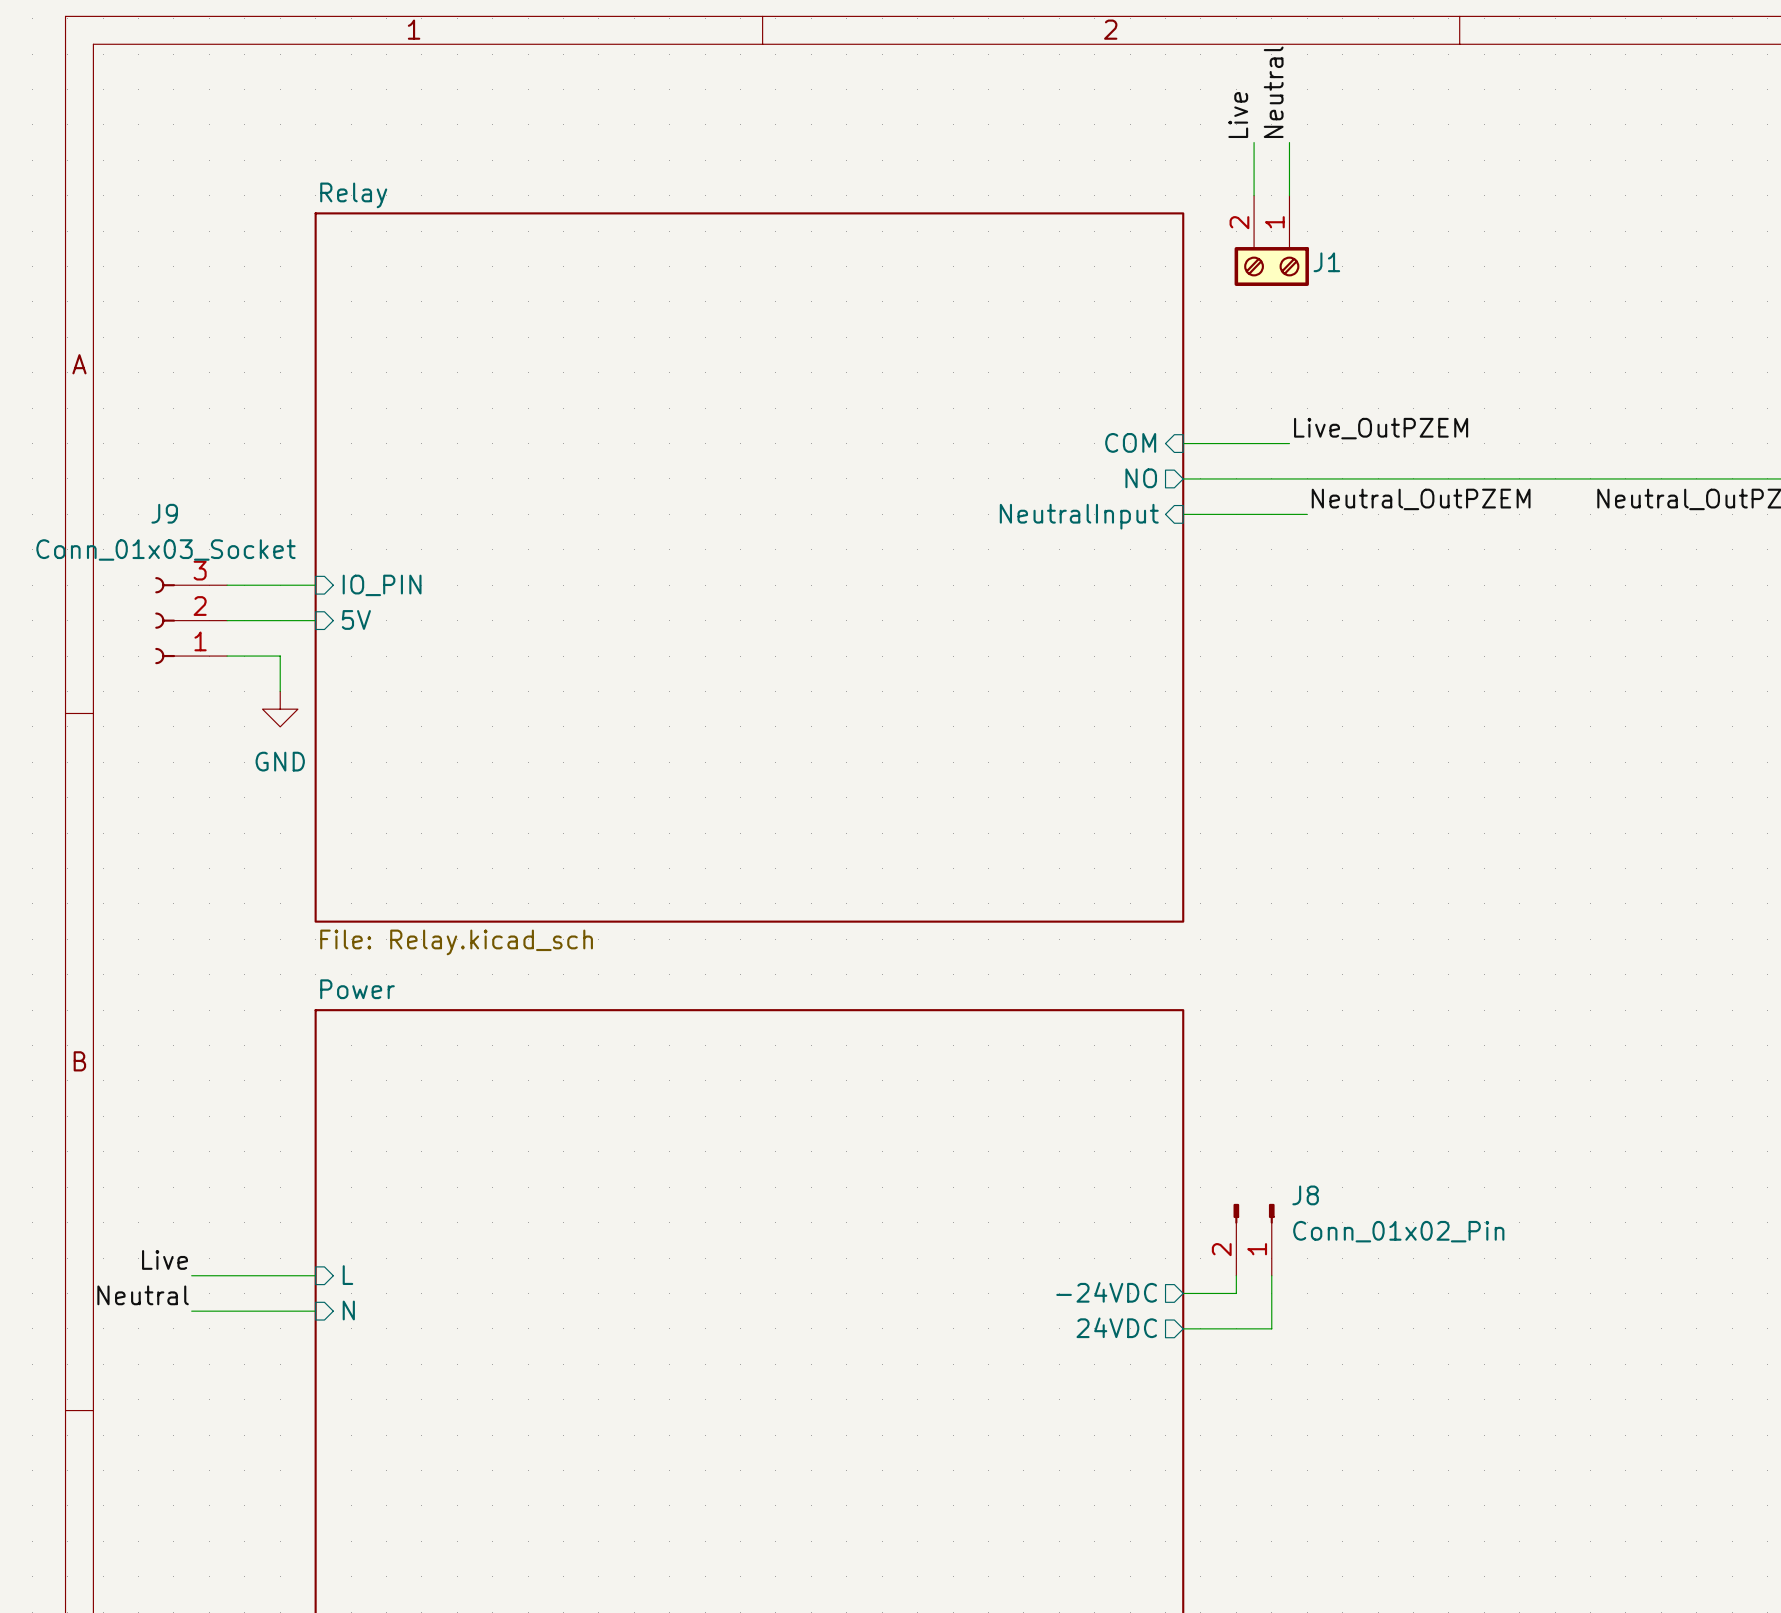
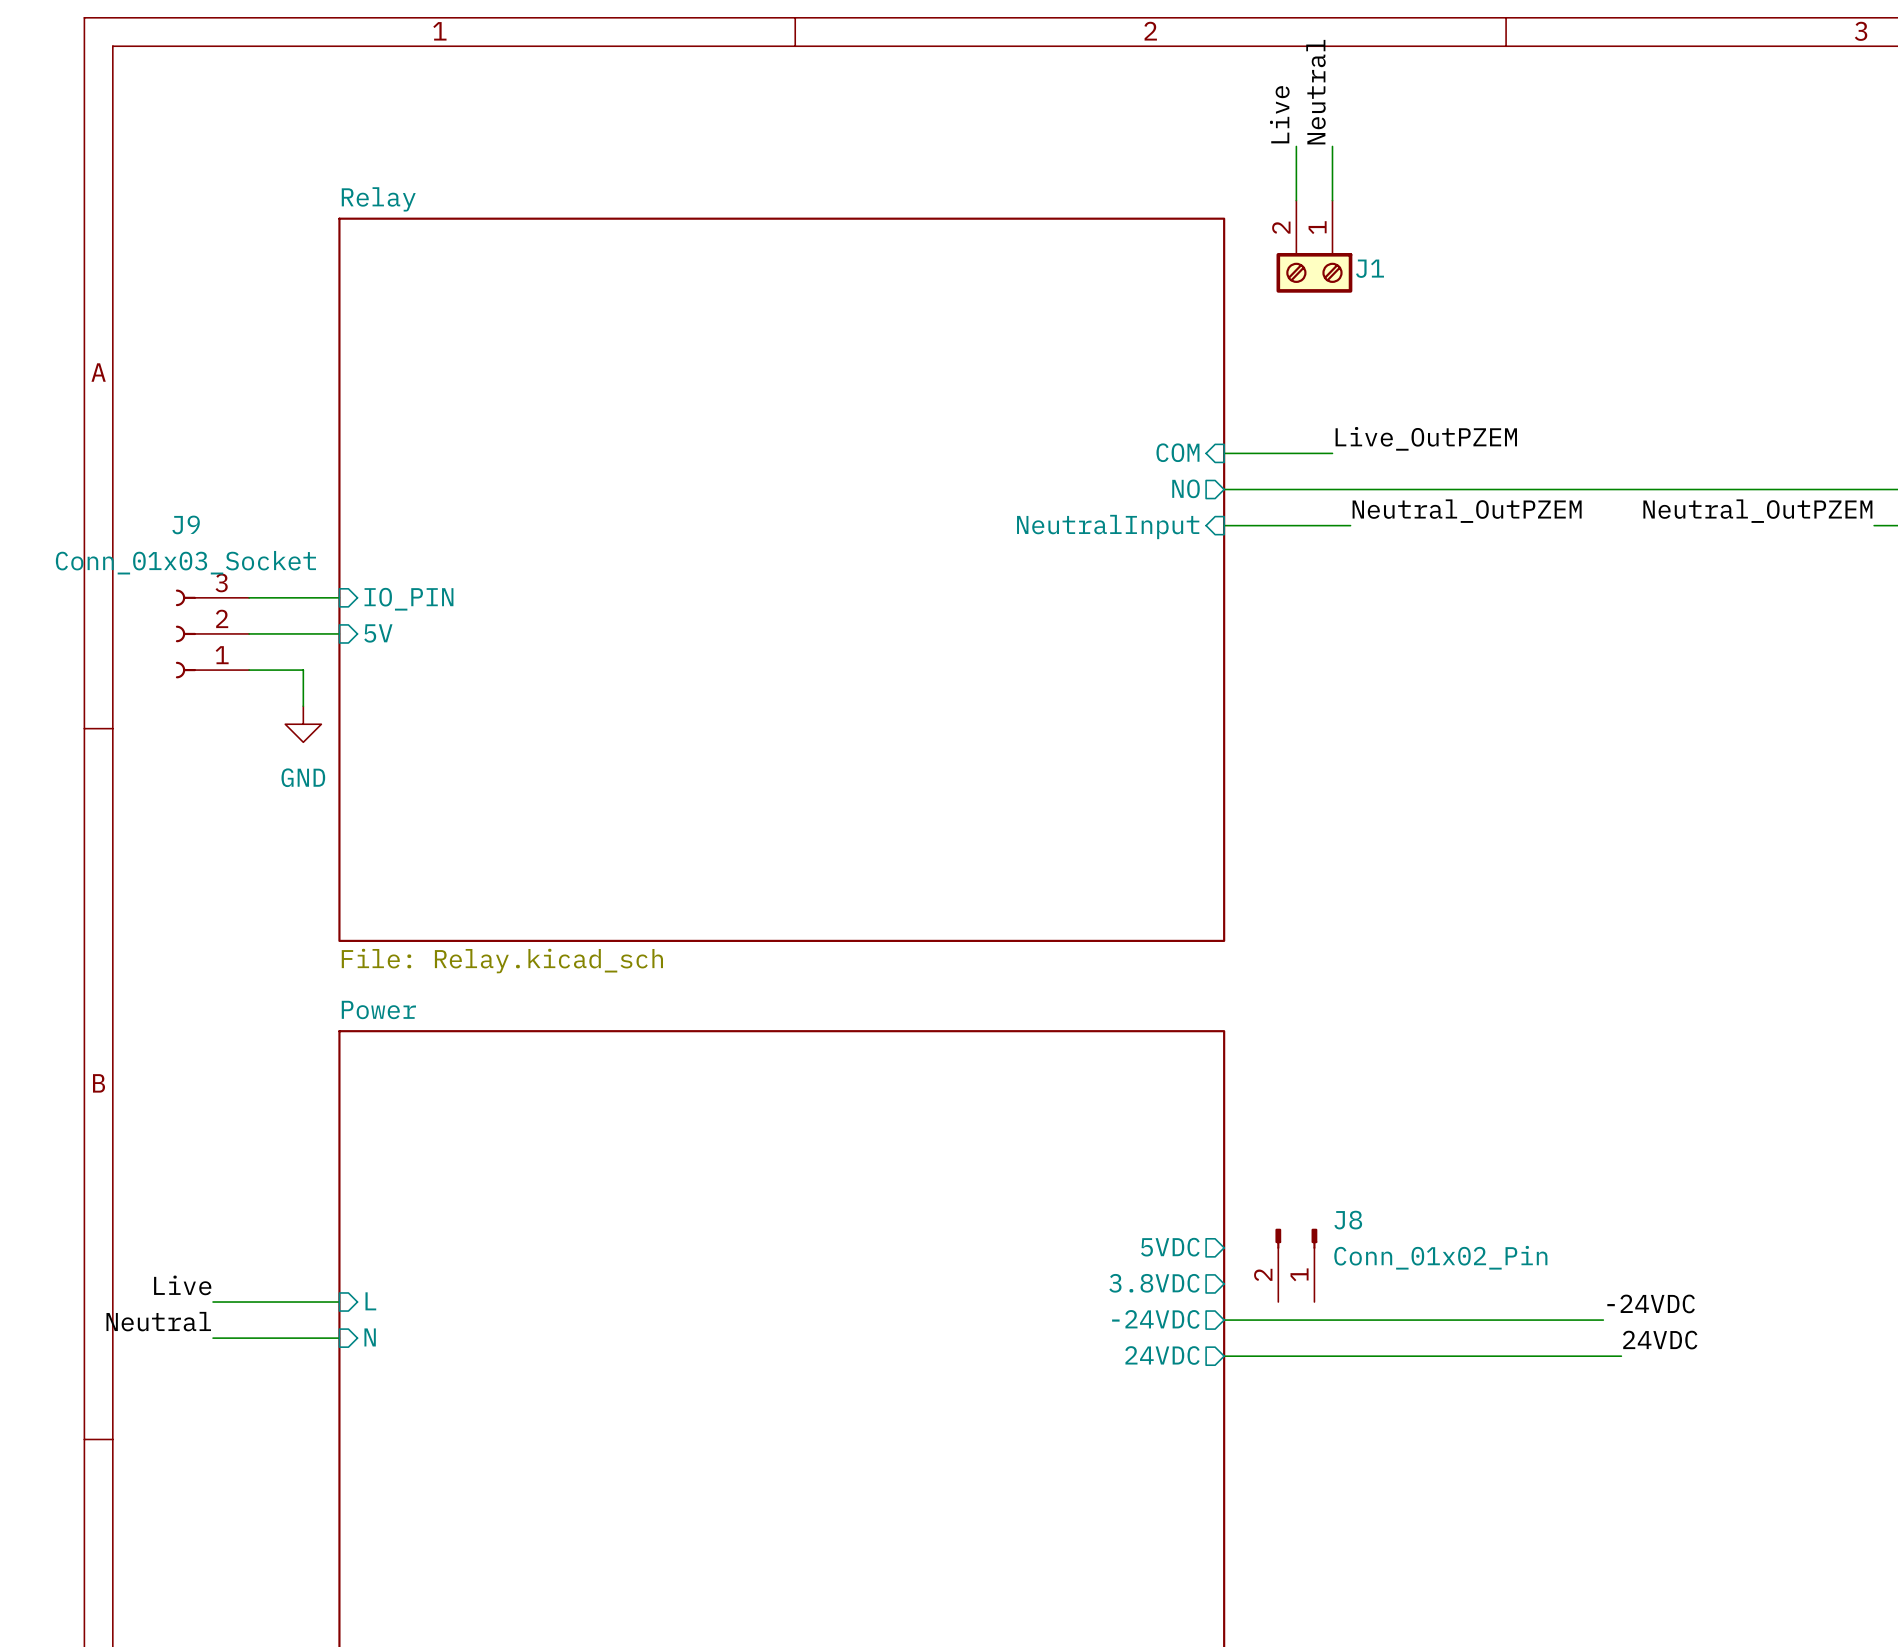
sheet pin: none -> 5VDC (1170, 1247)
sheet pin: none -> 3.8VDC (1154, 1283)
wire: (1236, 1275) (1236, 1293) -> (1603, 1320) (1278, 1320)
wire: (1271, 1275) (1271, 1328) -> (1621, 1356) (1314, 1356)
label: none -> -24VDC (1651, 1303)
label: none -> 24VDC (1660, 1340)

